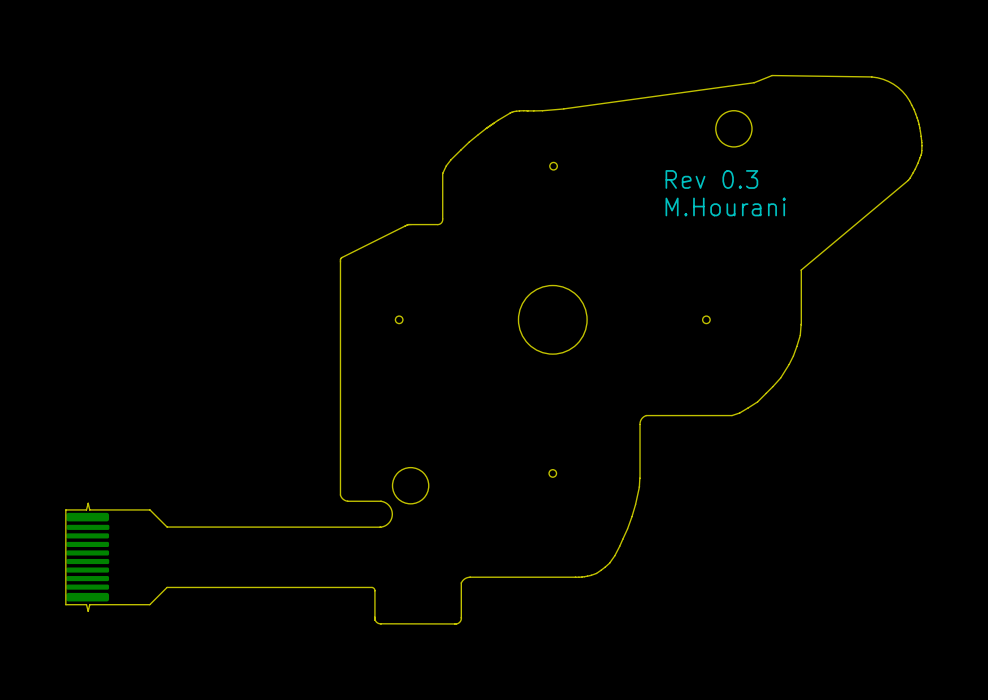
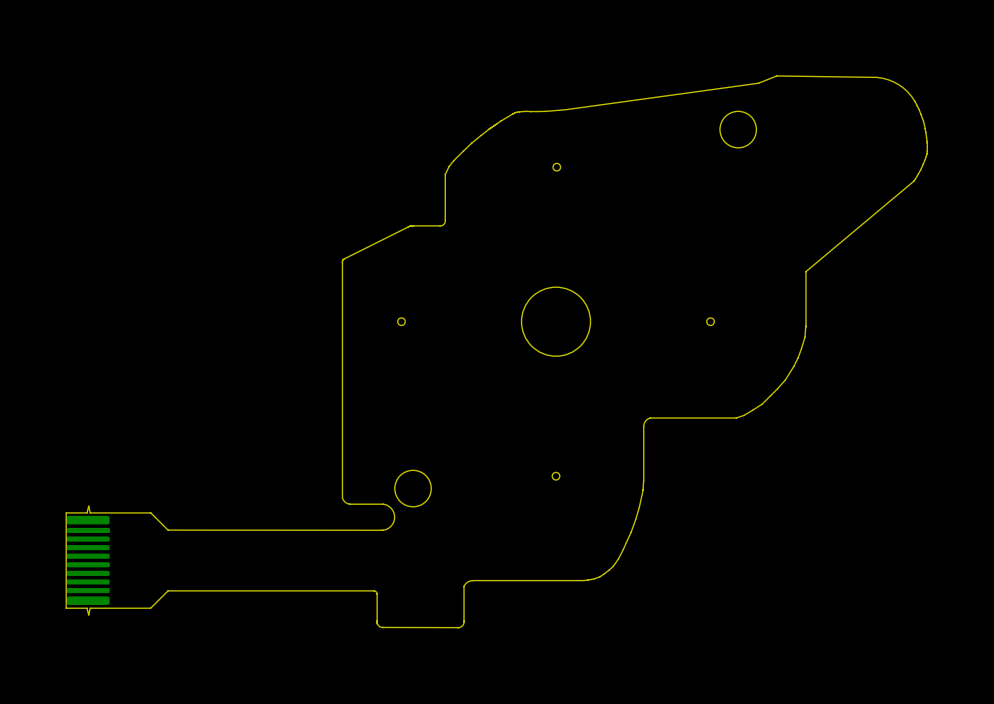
text: Rev 0.3 (711, 179) -> none
text: M.Hourani (725, 206) -> none

